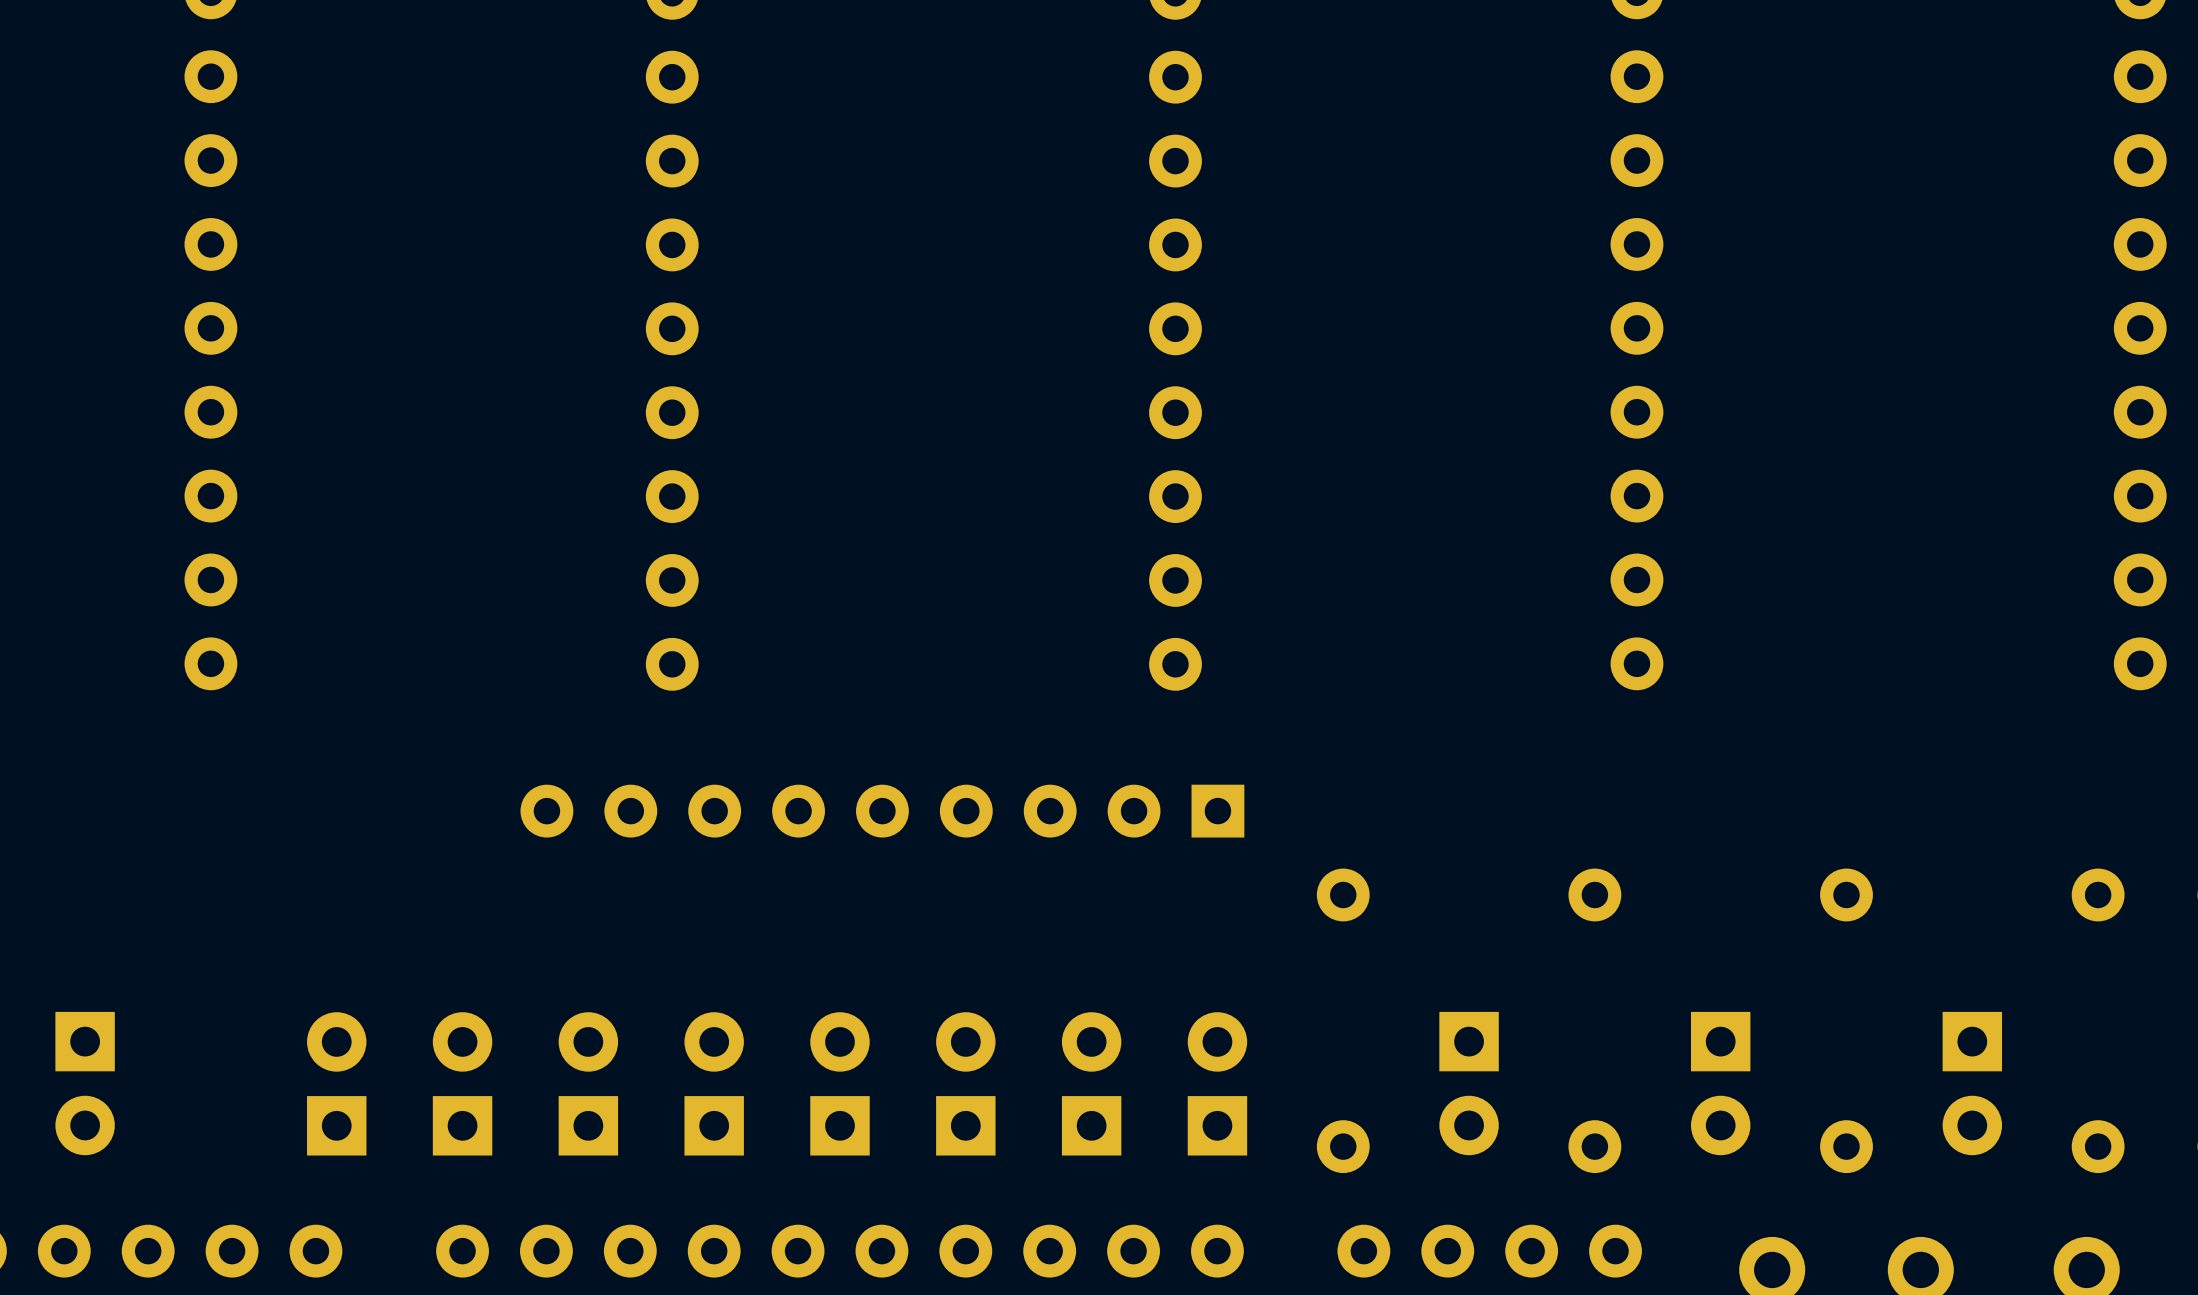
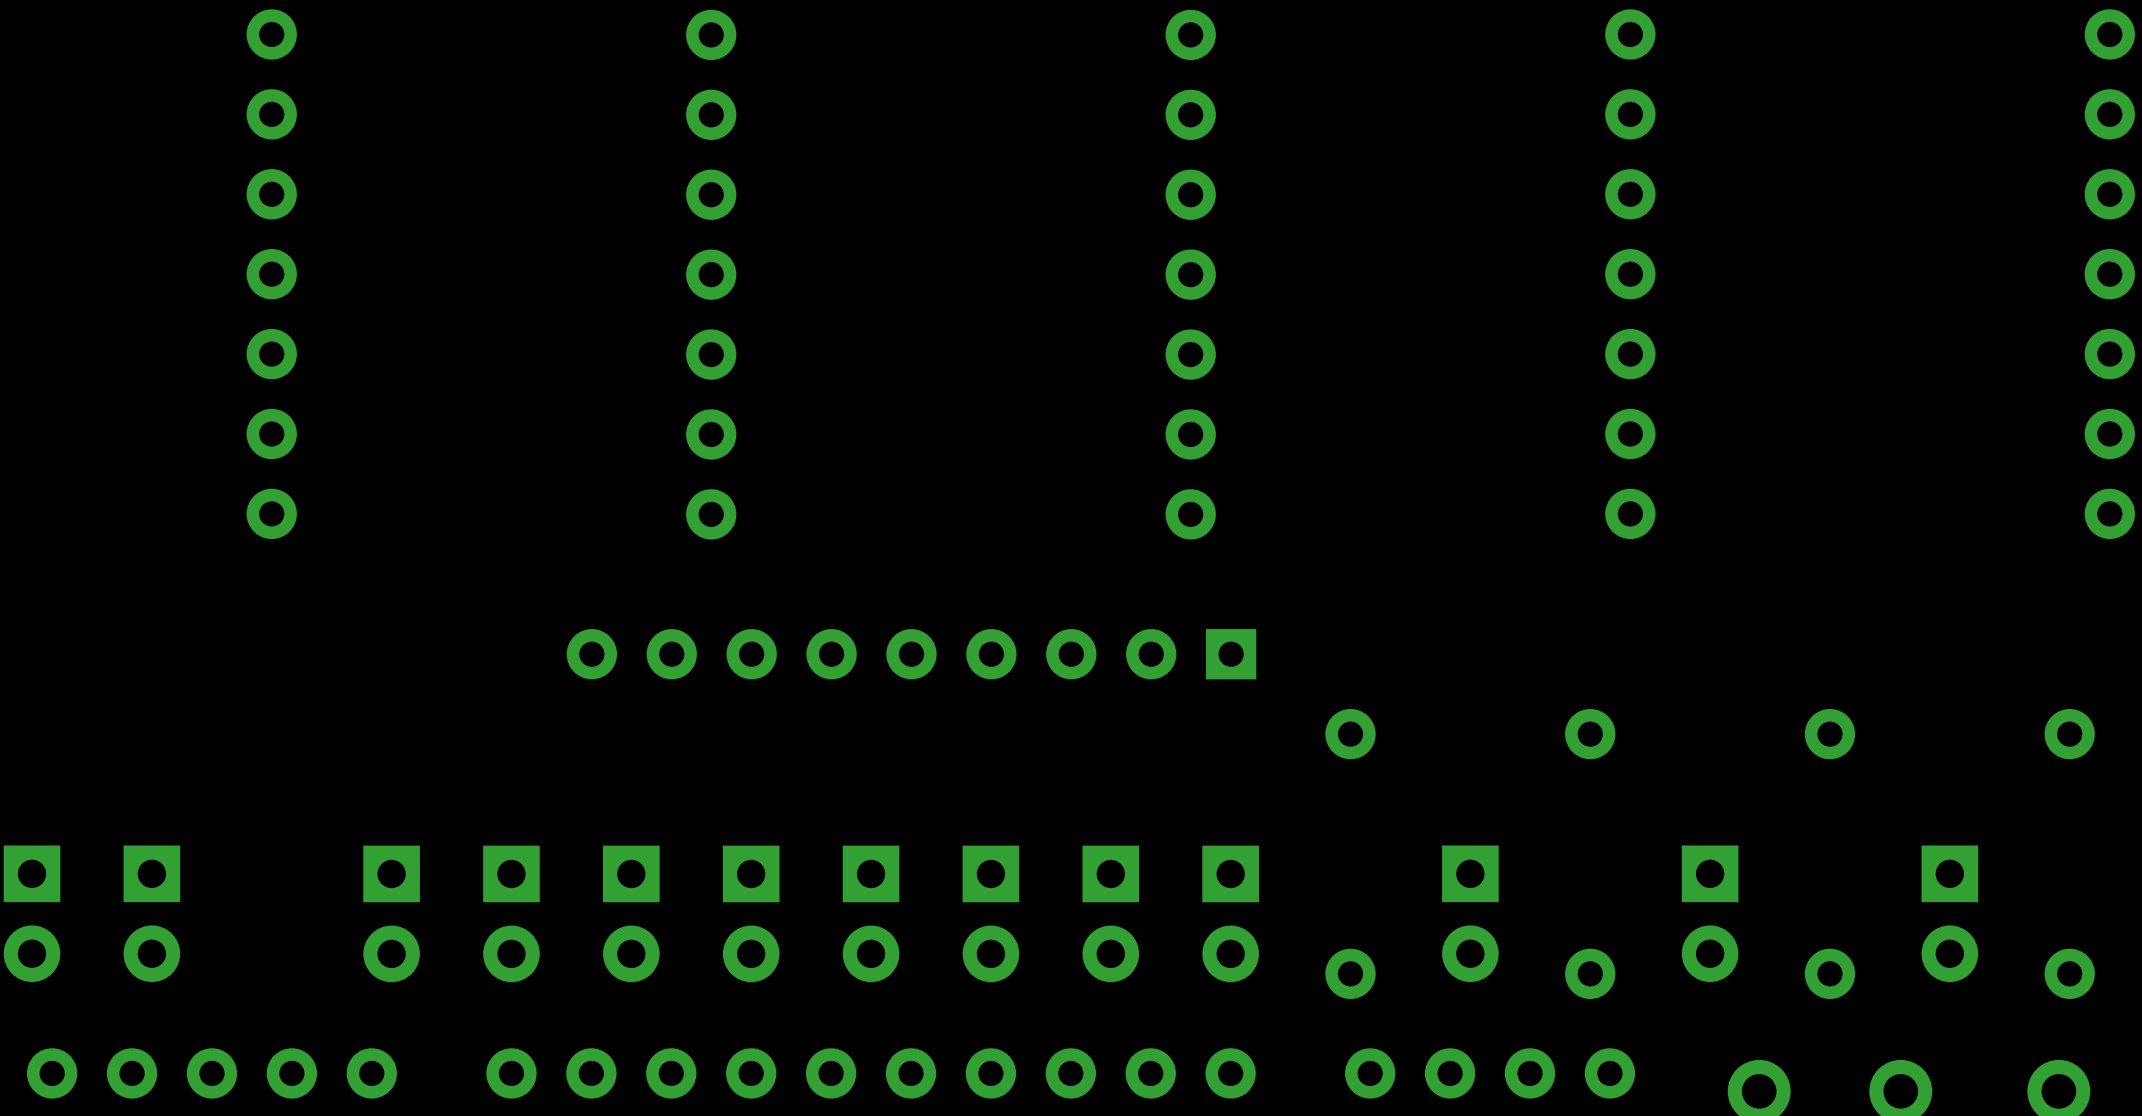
part rotation: 0° (336, 1083) -> 180° (391, 913)
part rotation: 0° (462, 1083) -> 180° (511, 913)
part rotation: 0° (588, 1083) -> 180° (631, 913)
part rotation: 0° (714, 1083) -> 180° (751, 913)
part rotation: 0° (840, 1083) -> 180° (871, 913)
part rotation: 0° (965, 1083) -> 180° (990, 913)
part rotation: 0° (1091, 1083) -> 180° (1110, 913)
part rotation: 0° (1217, 1083) -> 180° (1230, 913)

